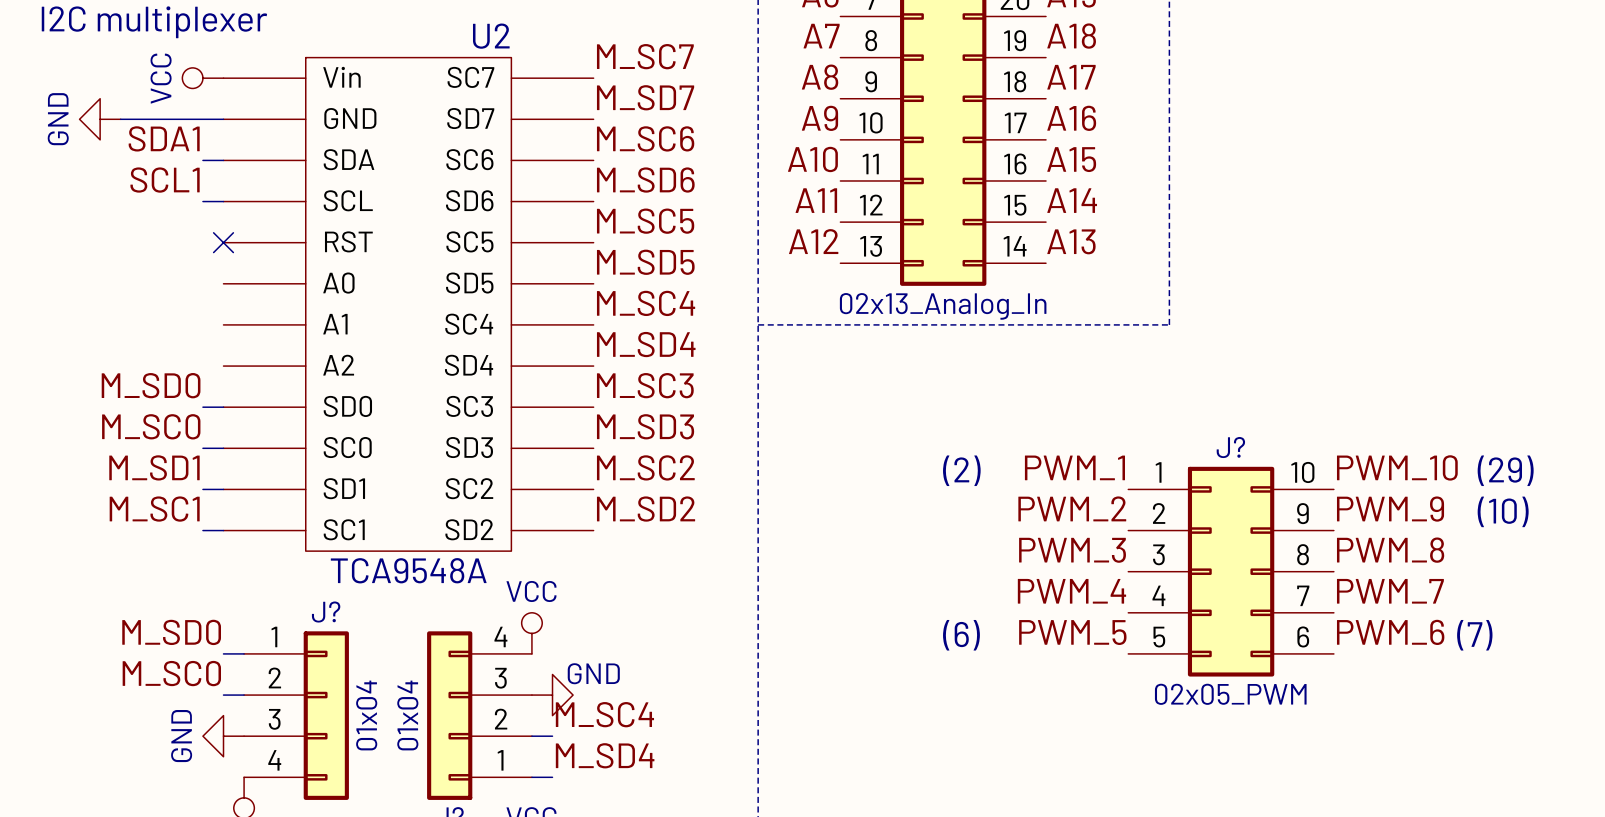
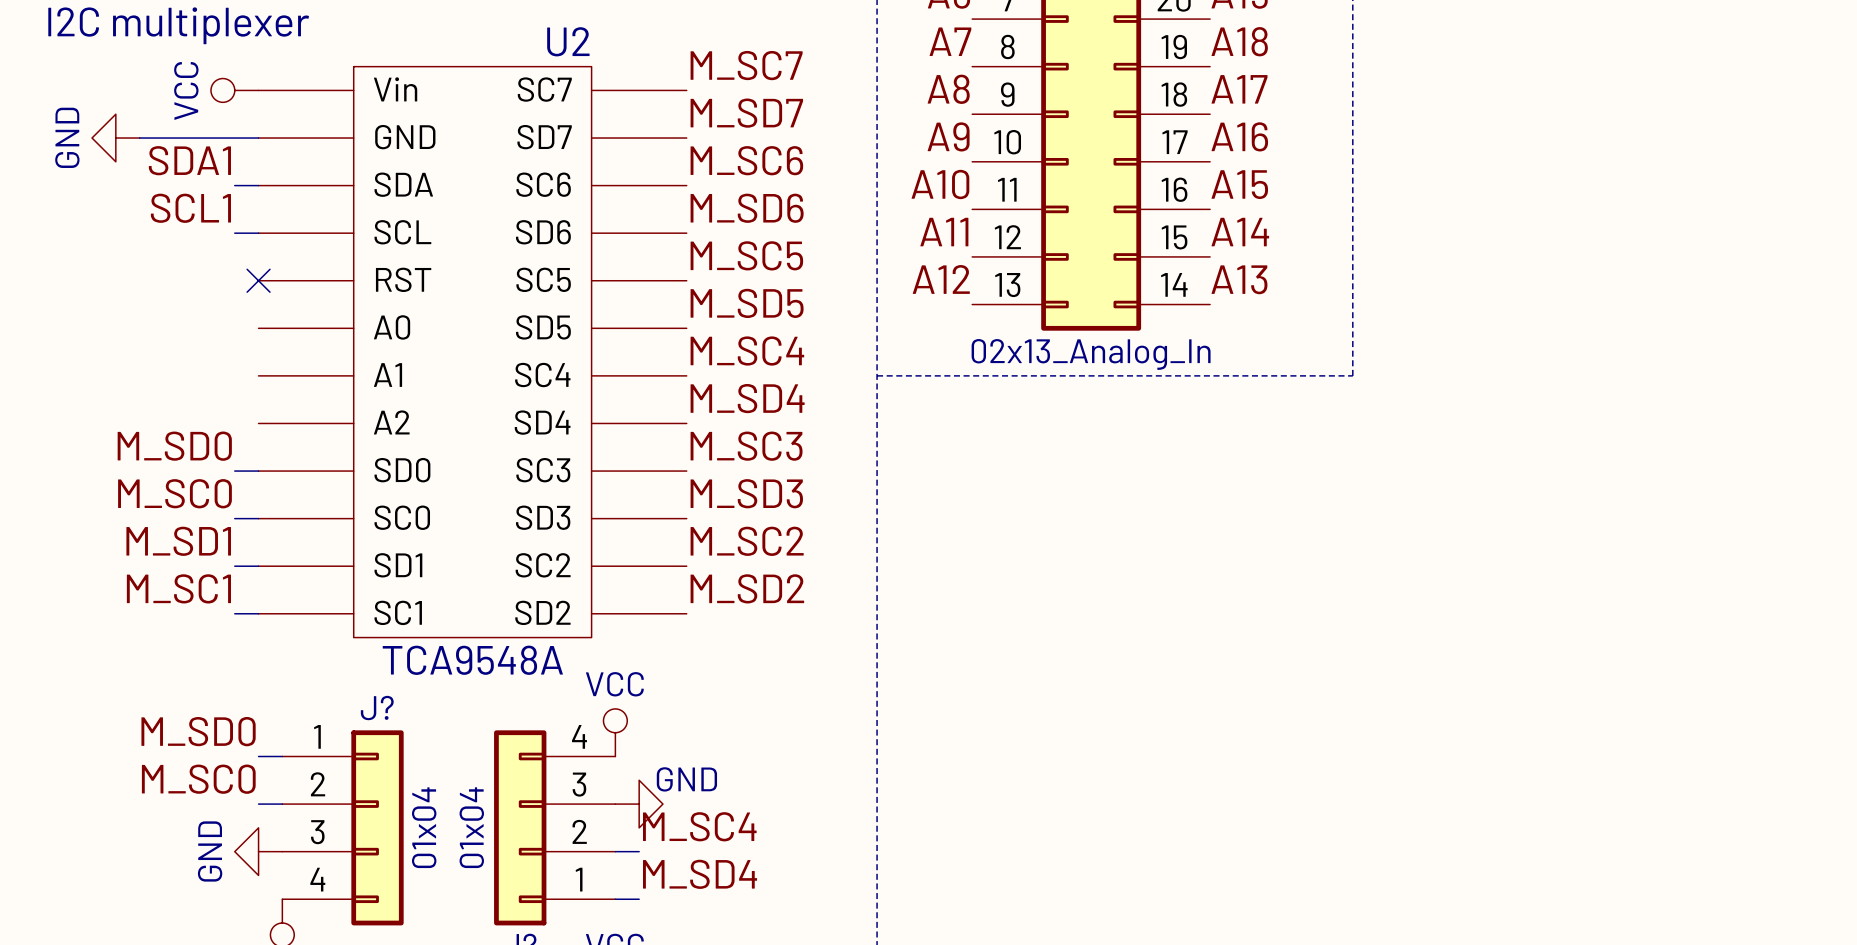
label: PWM_1 (1074, 467) -> none
label: PWM_10 (1397, 467) -> none
text: (2) (961, 470) -> none
text: (29) (1505, 470) -> none
label: PWM_2 (1072, 508) -> none
label: PWM_9 (1390, 509) -> none
text: (10) (1503, 511) -> none
label: PWM_3 (1072, 550) -> none
label: PWM_8 (1390, 550) -> none
J?: 02x05_PWM (1231, 571) -> none
label: PWM_4 (1071, 591) -> none
label: PWM_7 (1390, 591) -> none
label: PWM_5 (1072, 632) -> none
label: PWM_6 (1390, 632) -> none
text: (6) (961, 635) -> none
text: (7) (1474, 635) -> none

